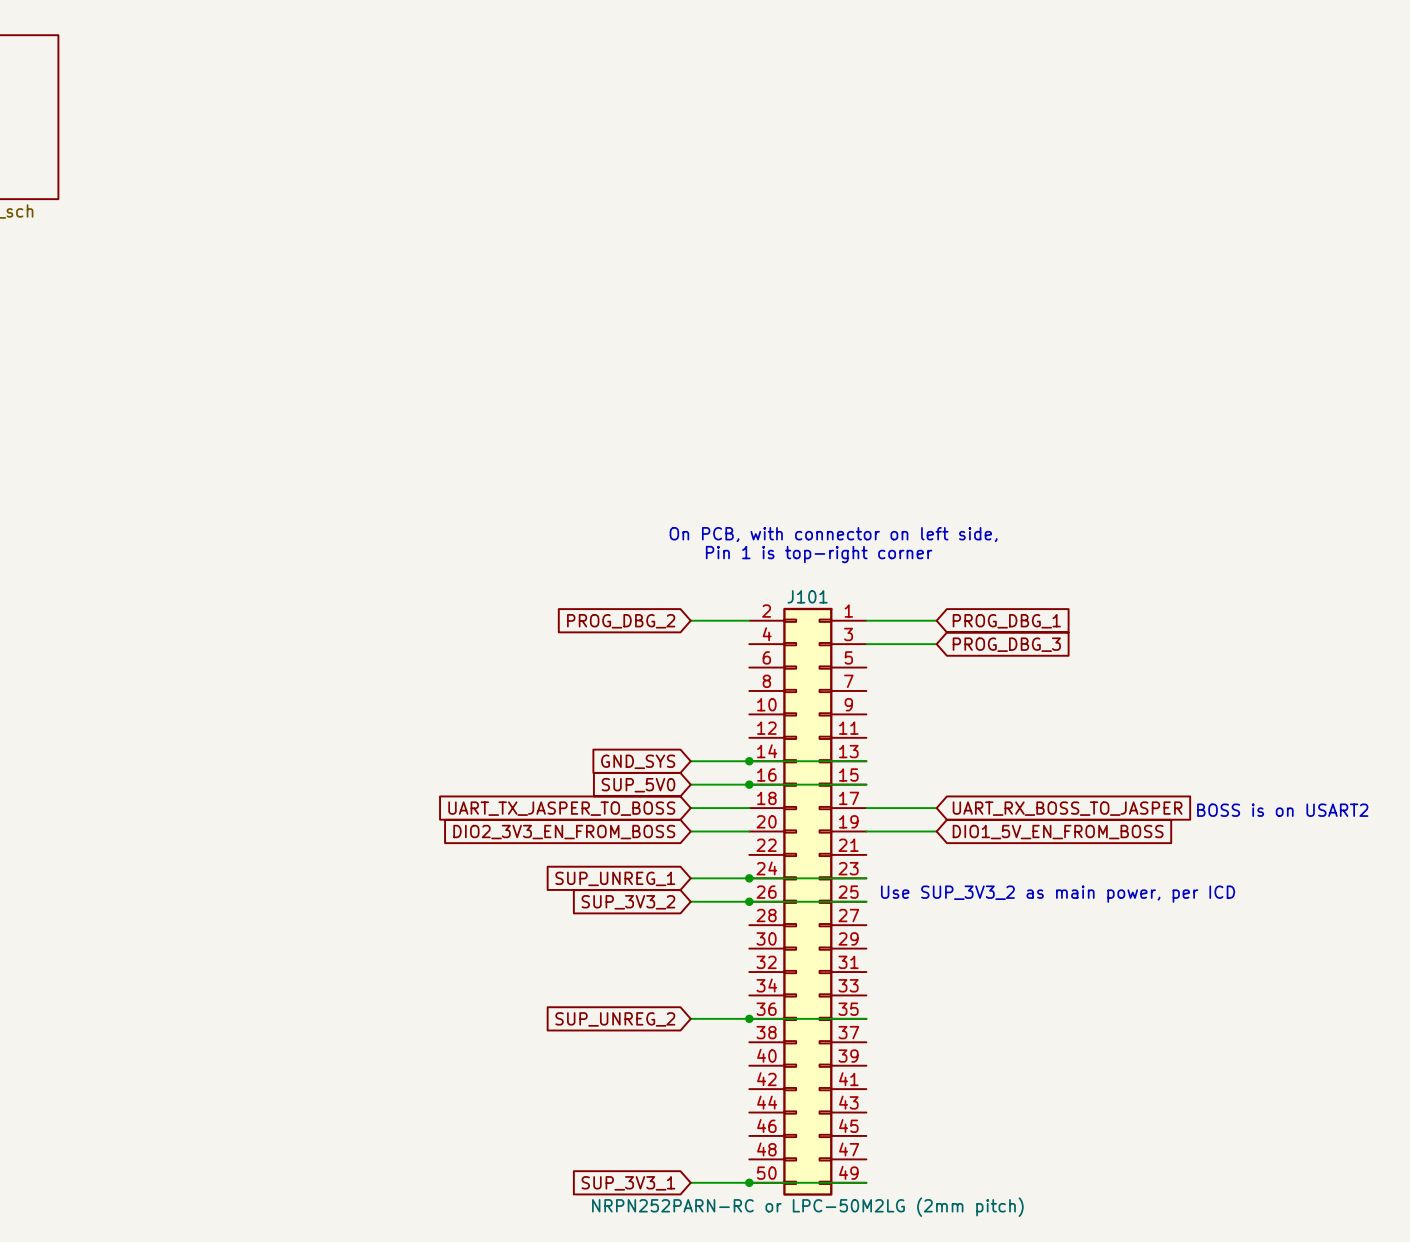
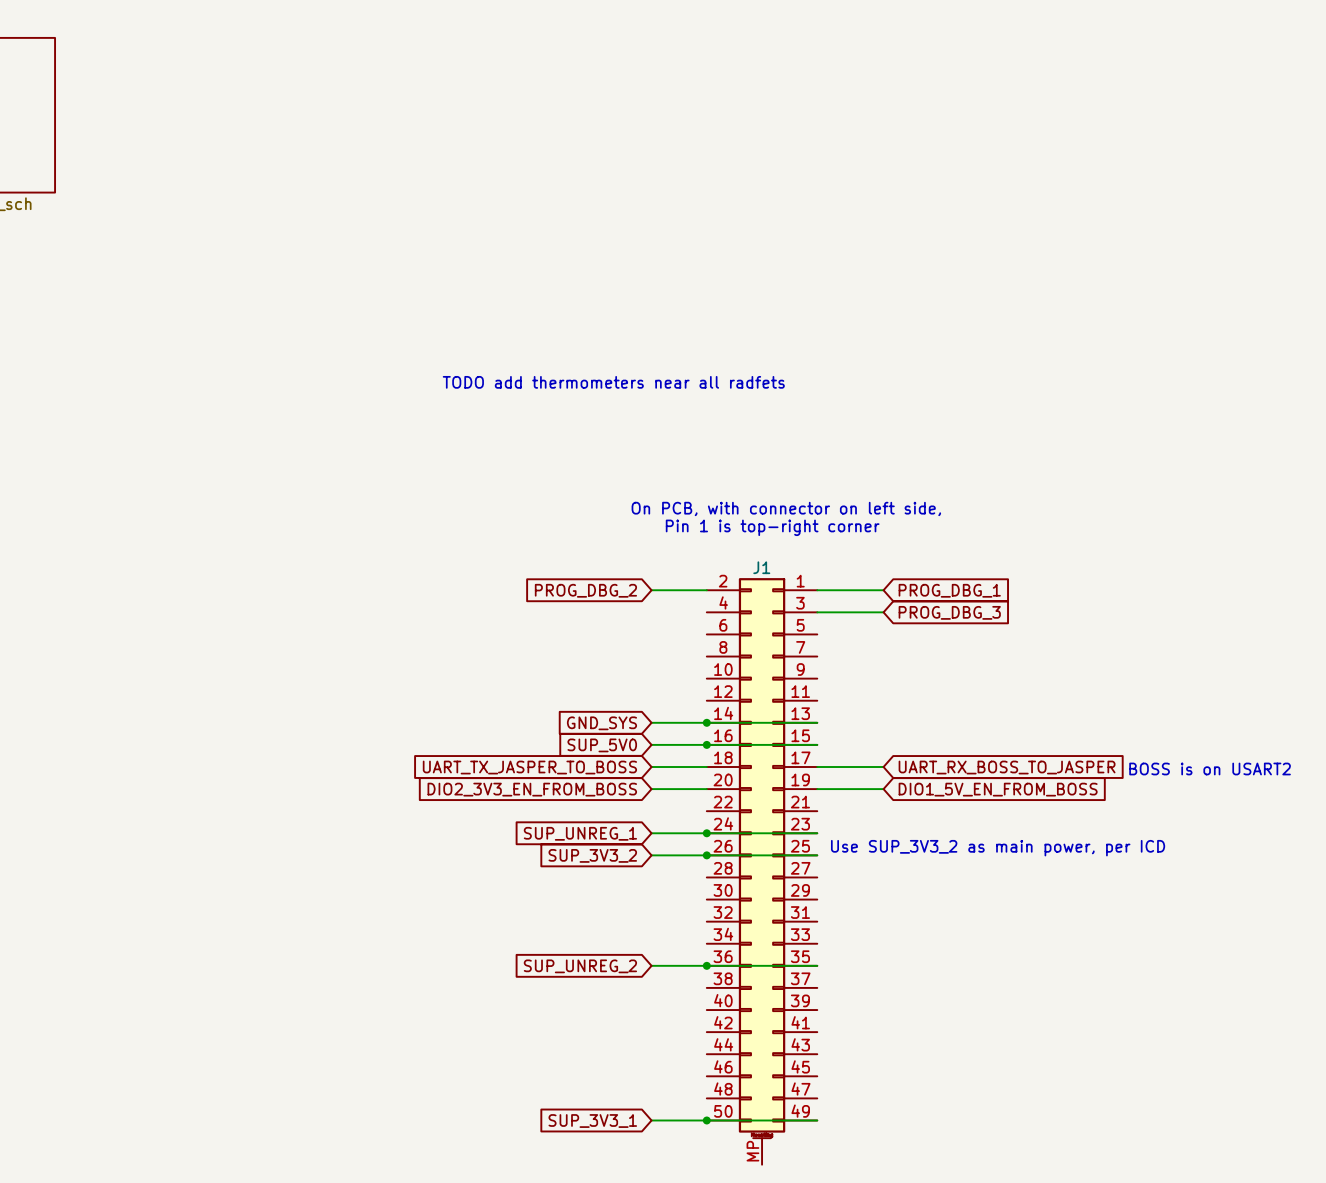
text: none -> TODO add thermometers near all radfets (613, 382)
J101: NRPN252PARN-RC or LPC-50M2LG (2mm pitch) (807, 901) -> none
J1: none -> (762, 871)

